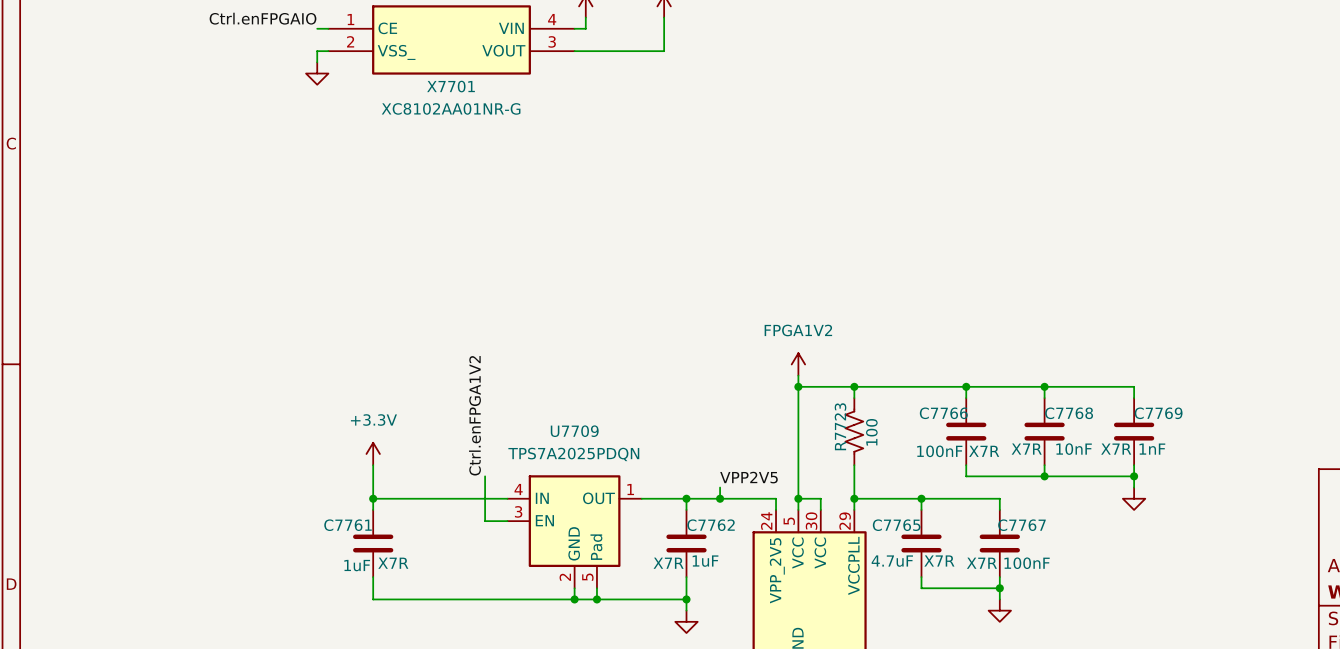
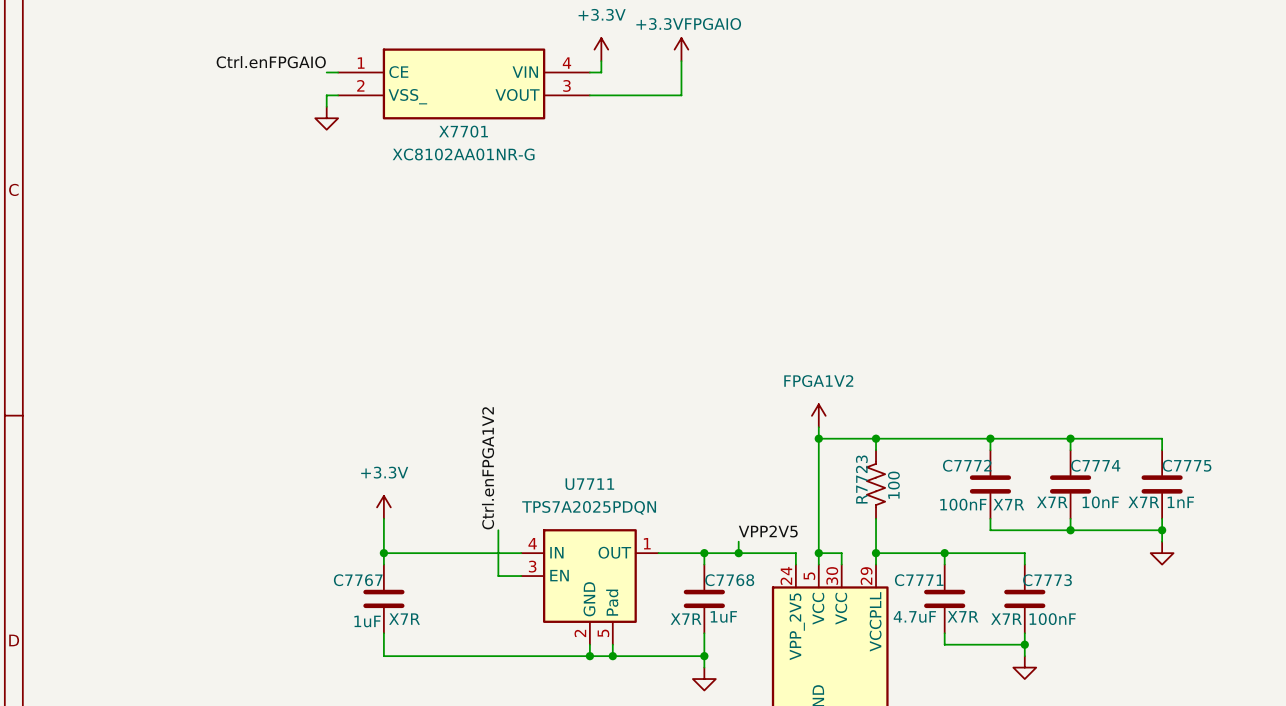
C7766 name: C7766 (943, 413) -> C7772 (967, 465)
C7768 name: C7768 (1069, 413) -> C7774 (1095, 465)
C7769 name: C7769 (1158, 413) -> C7775 (1187, 465)
U7709 name: U7709 (574, 431) -> U7711 (589, 484)
C7761 name: C7761 (348, 525) -> C7767 (358, 580)
C7762 name: C7762 (711, 525) -> C7768 (729, 580)
C7765 name: C7765 (896, 525) -> C7771 (919, 580)
C7767 name: C7767 (1021, 525) -> C7773 (1047, 580)

